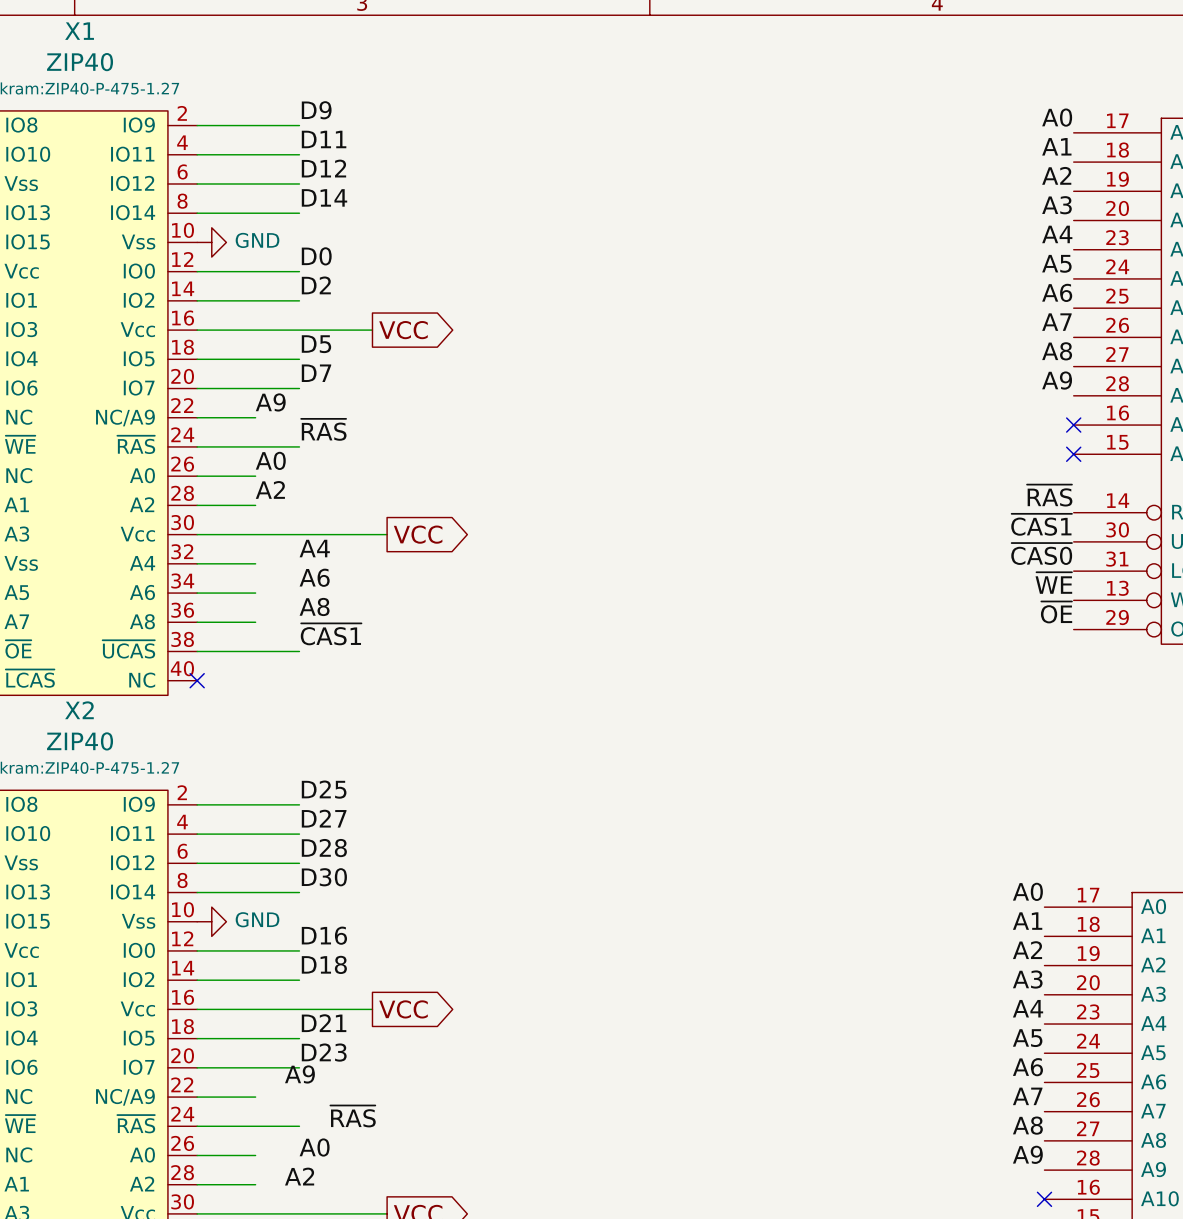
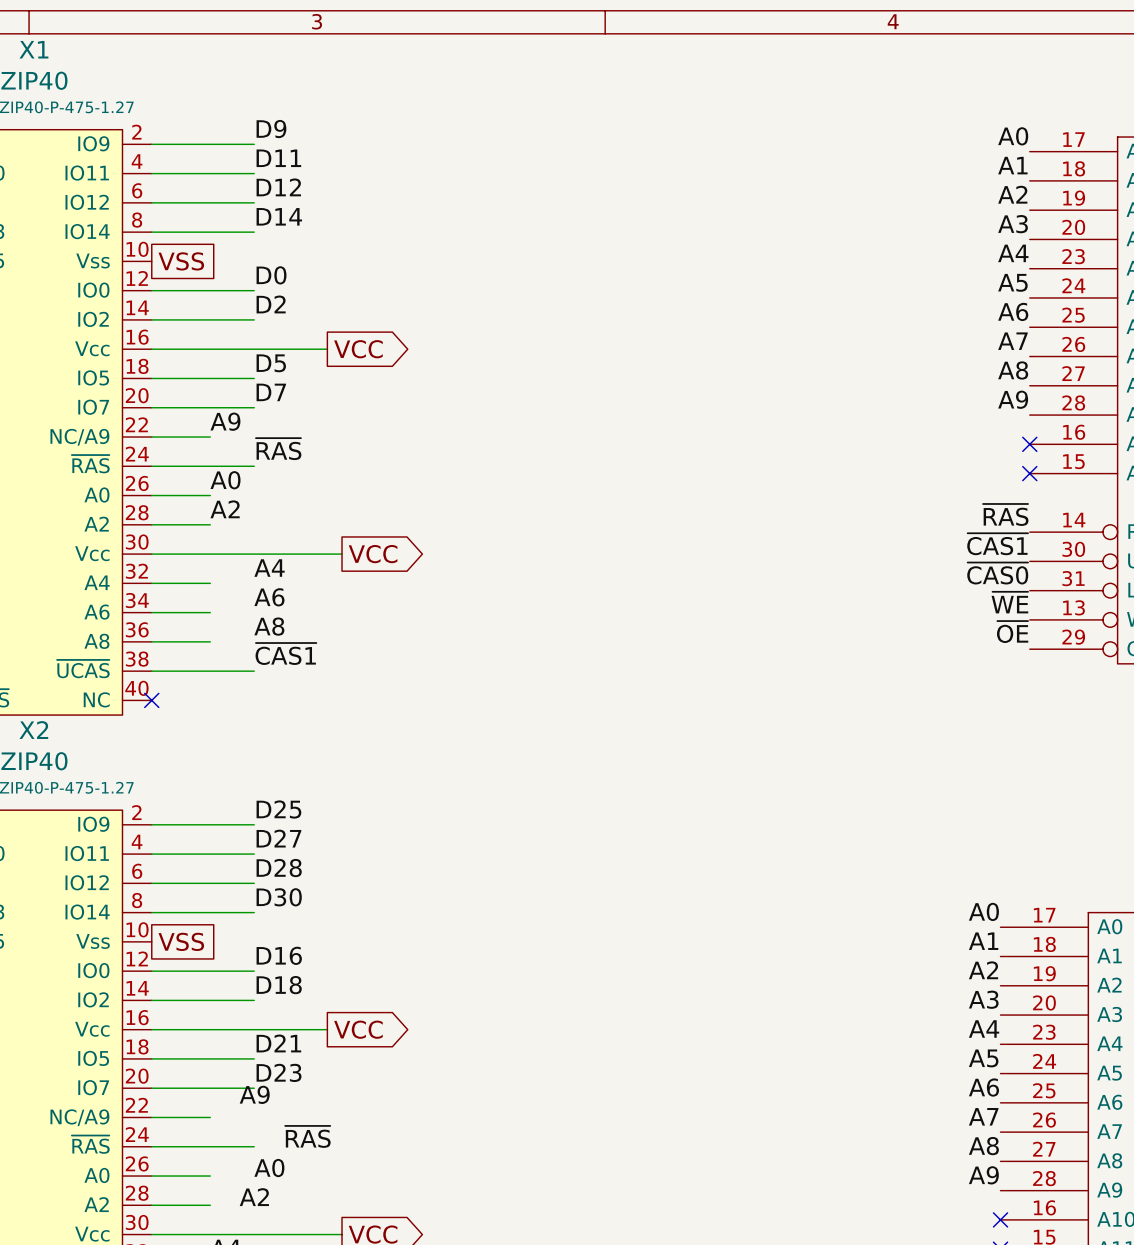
power symbol: GND (211, 242) -> none
global label: none -> VSS (181, 261)
power symbol: GND (211, 921) -> none
global label: none -> VSS (181, 941)

